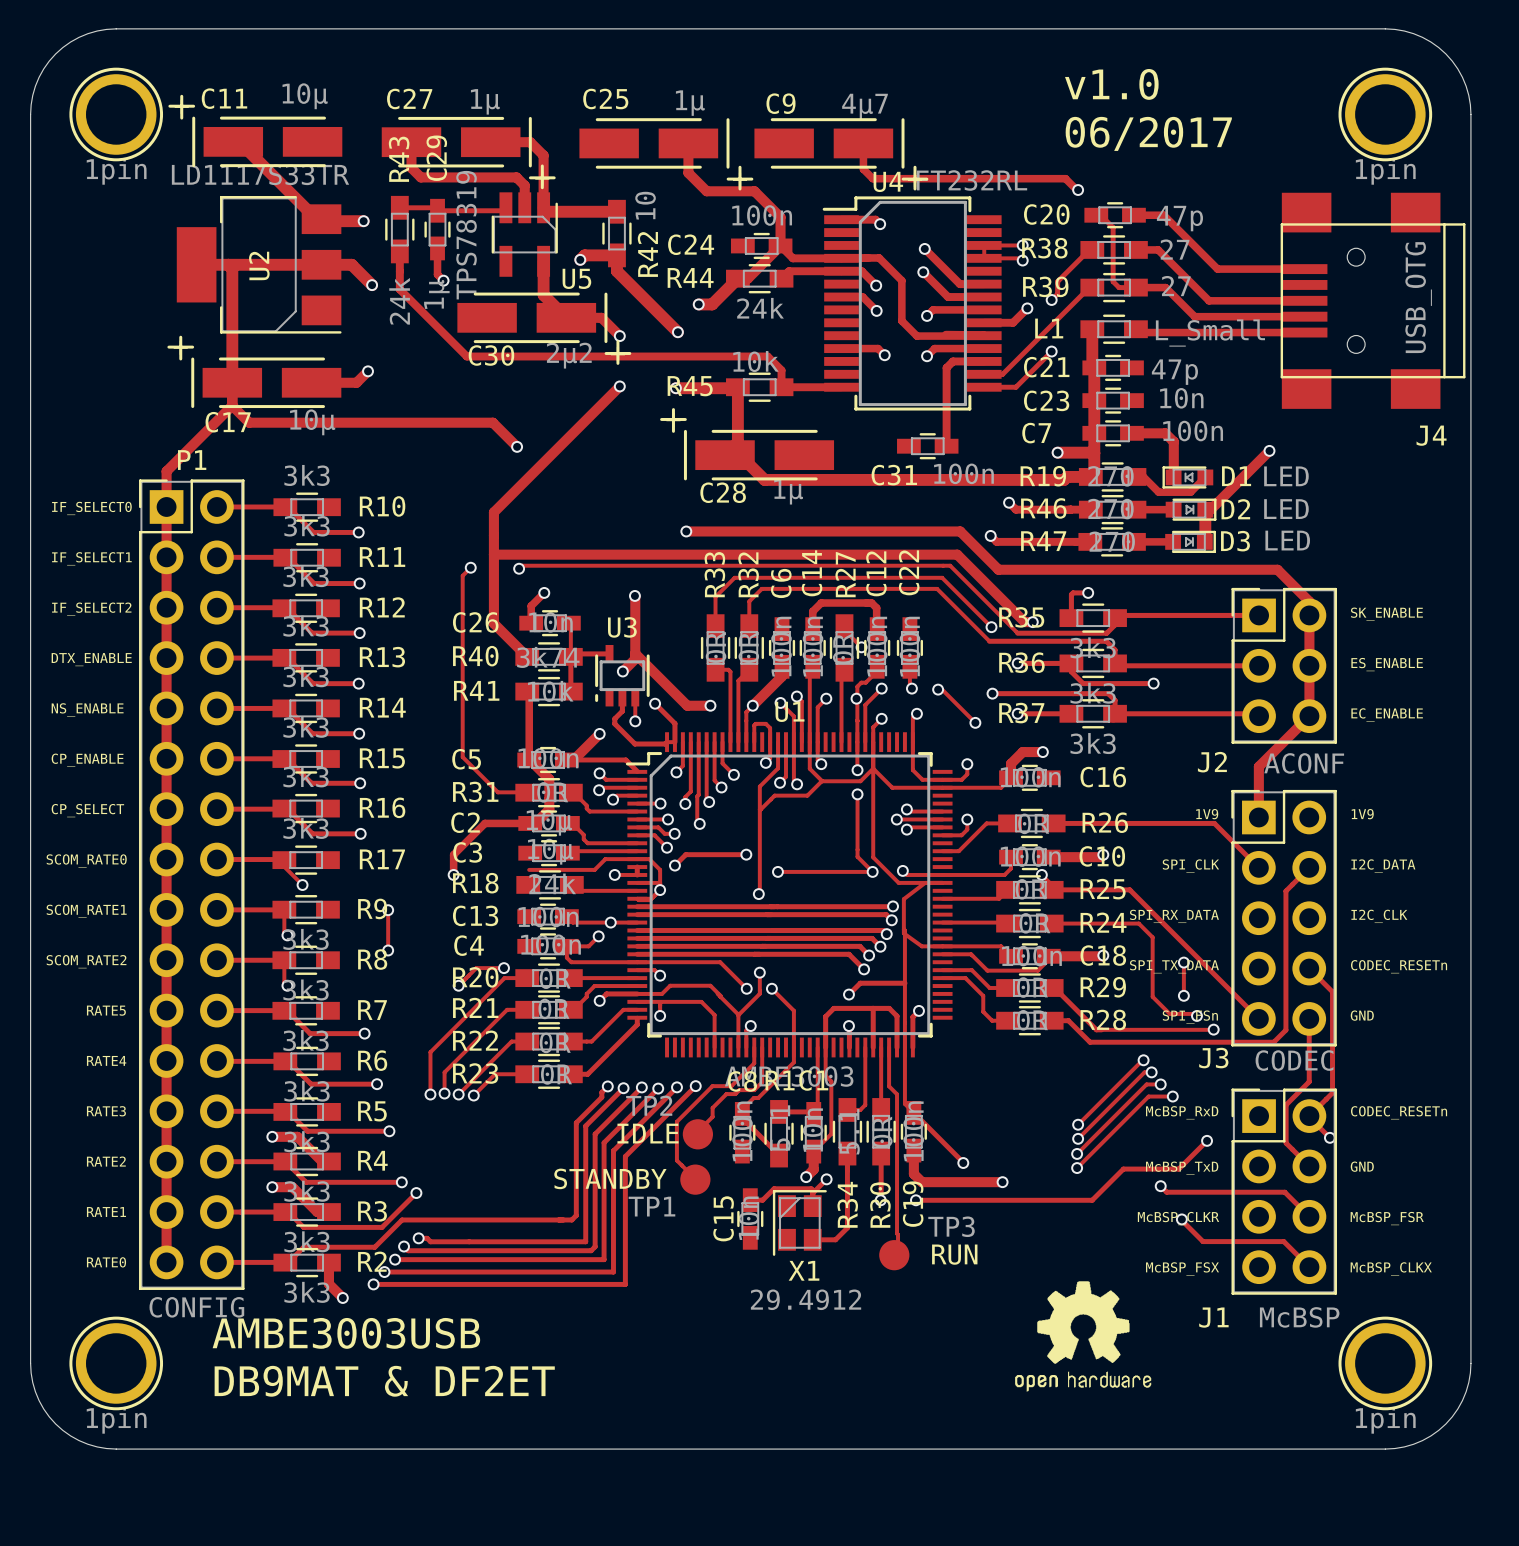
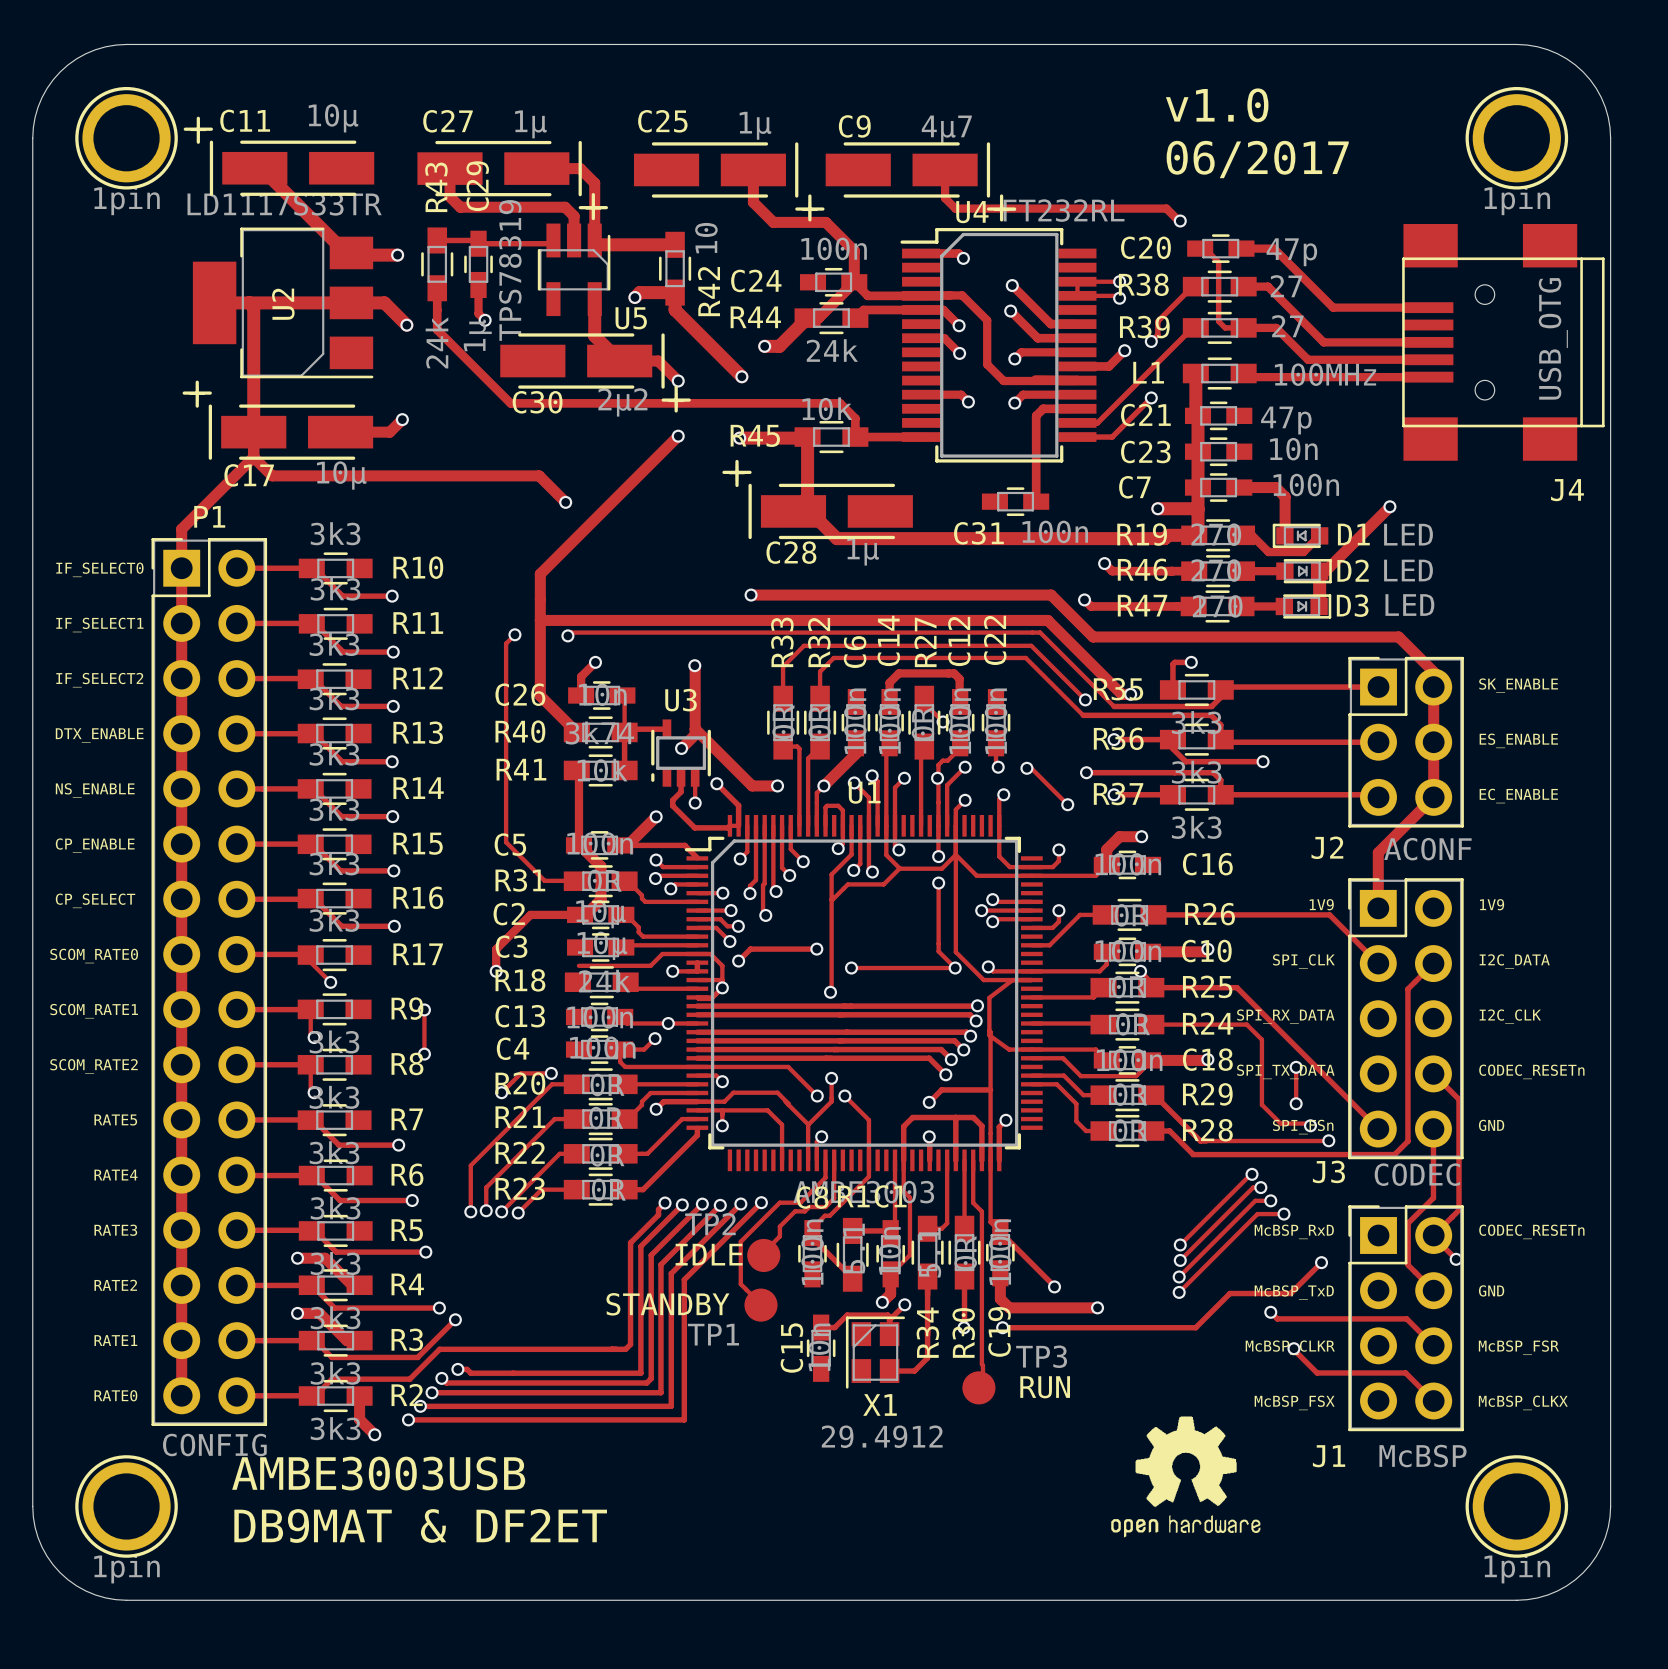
L1 value: L_Small (1210, 333) -> 100MHz (1325, 374)

